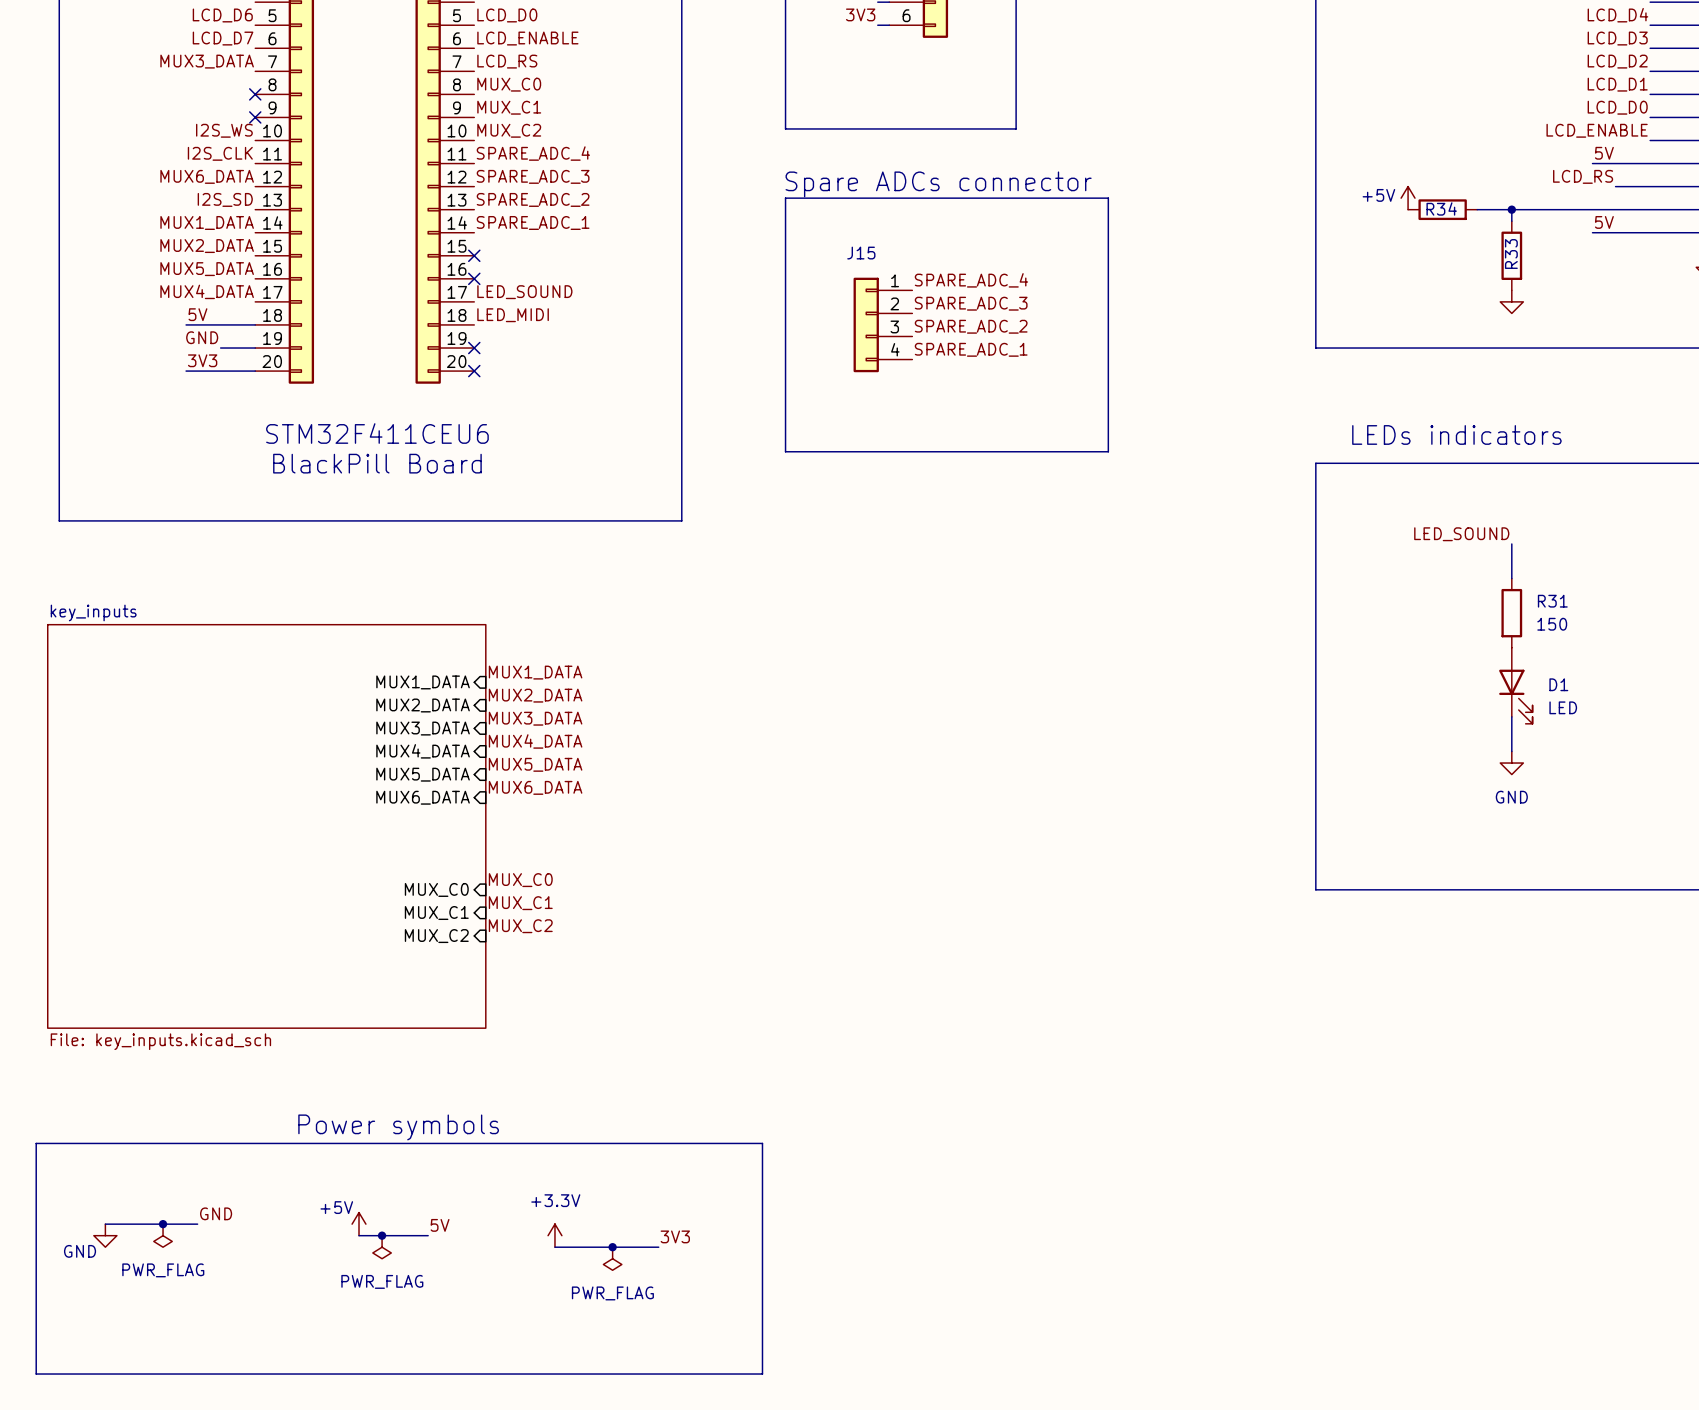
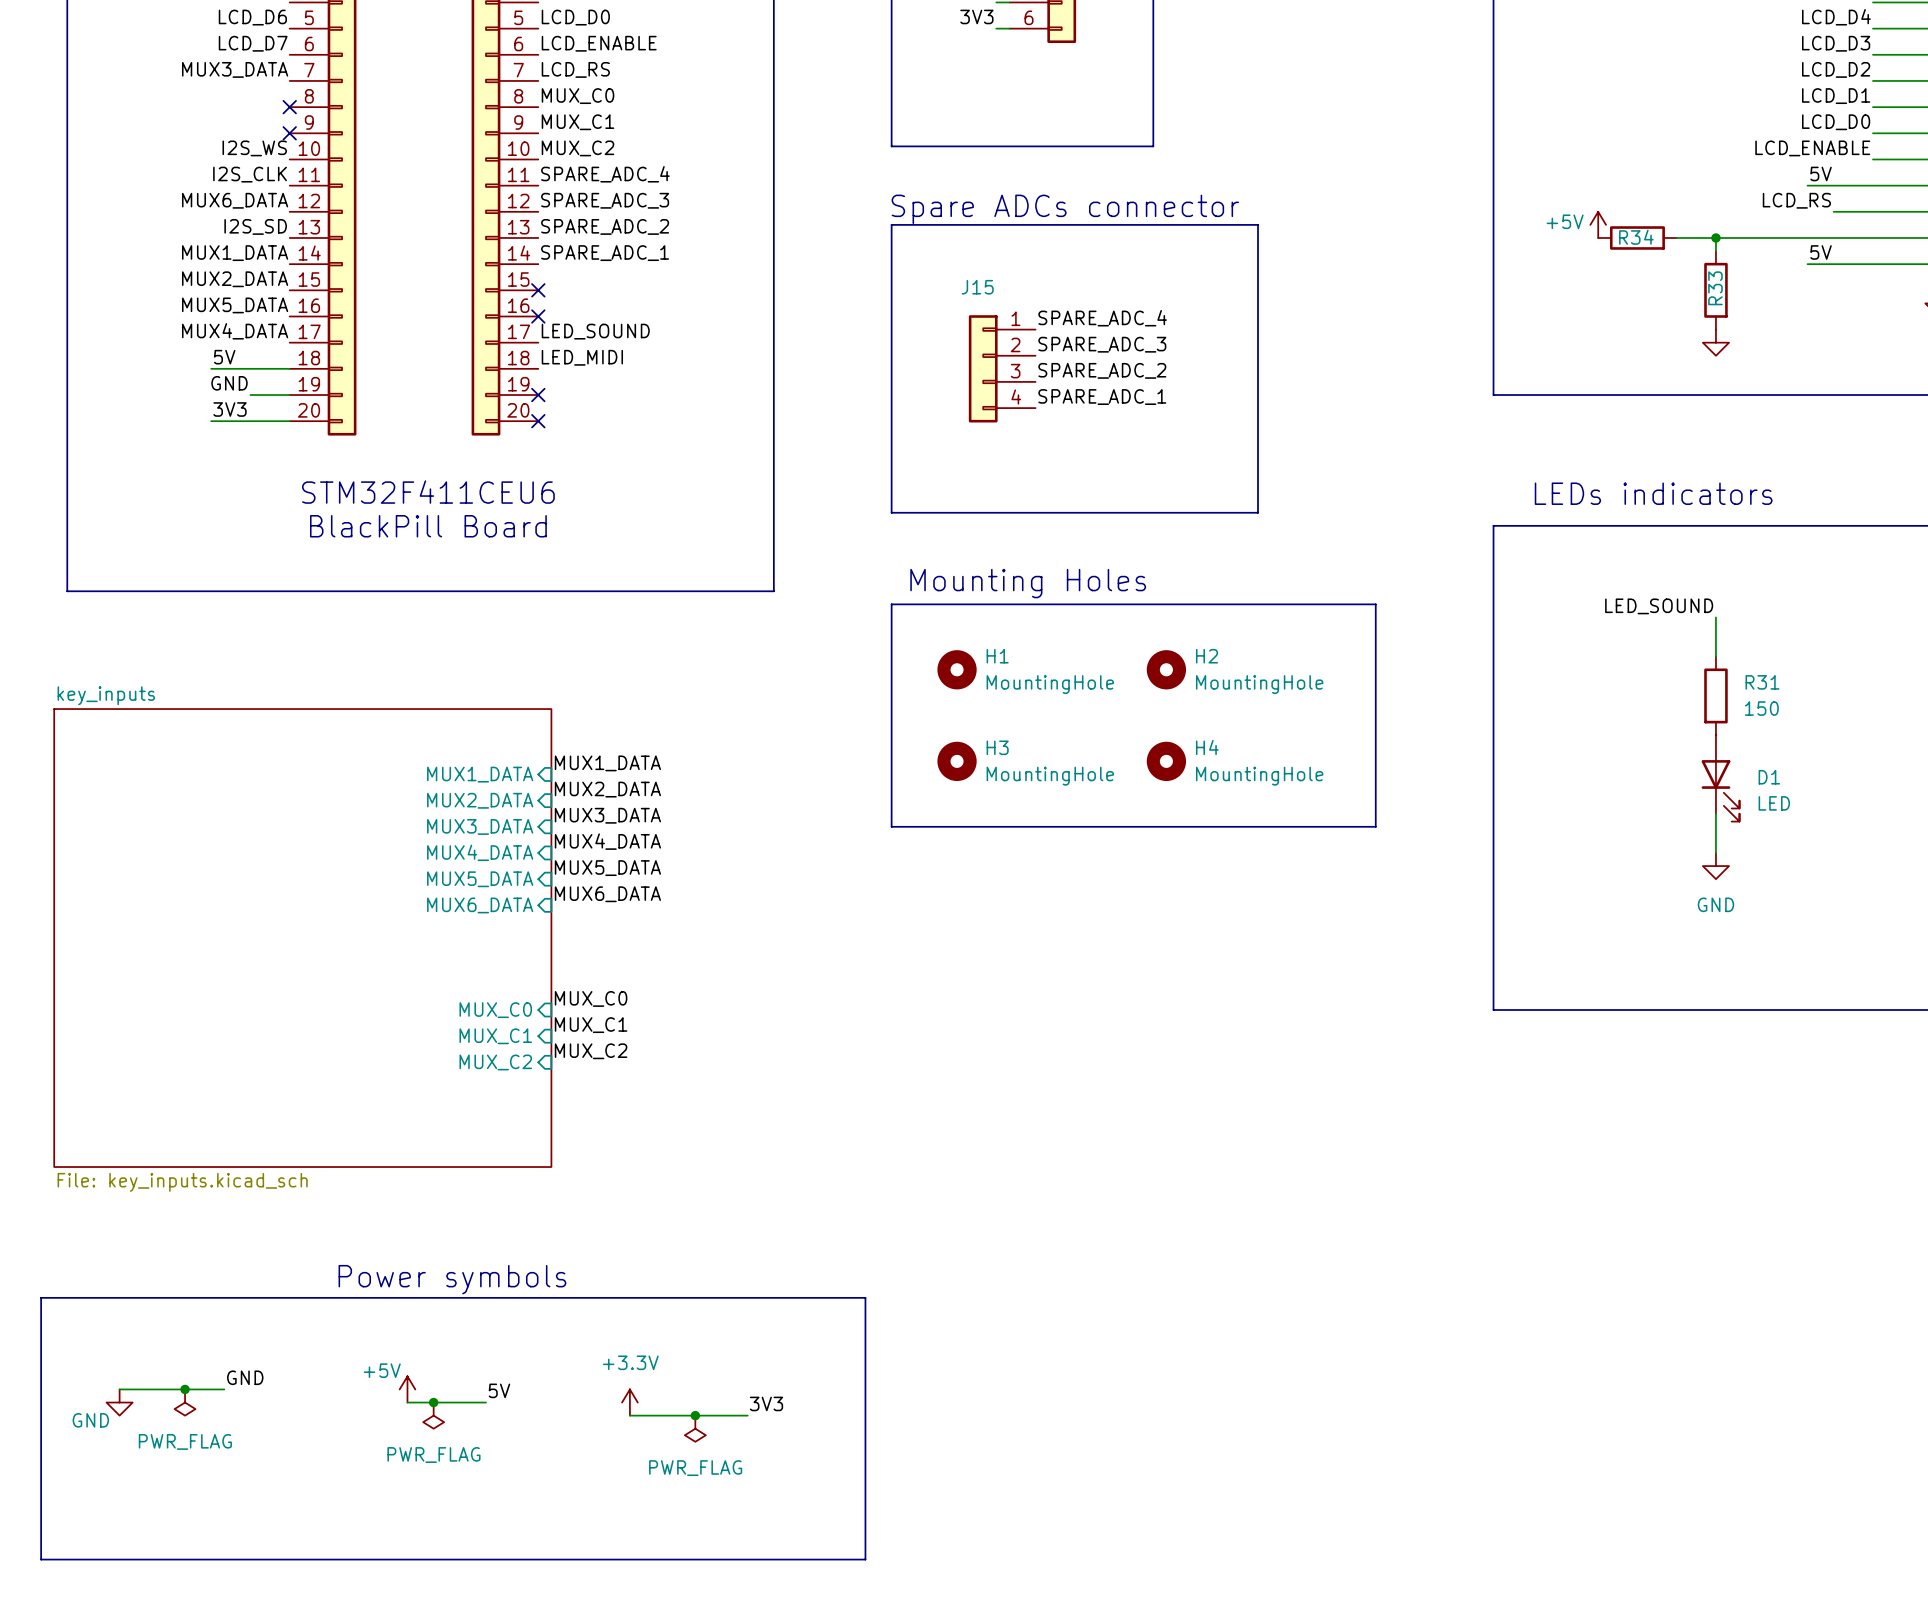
text: none -> Mounting Holes (1028, 583)
line: none -> (891, 604) (1375, 604) (1375, 826) (891, 826) (891, 604)
H1: none -> MountingHole (957, 669)
H2: none -> MountingHole (1166, 669)
H3: none -> MountingHole (957, 761)
H4: none -> MountingHole (1166, 761)

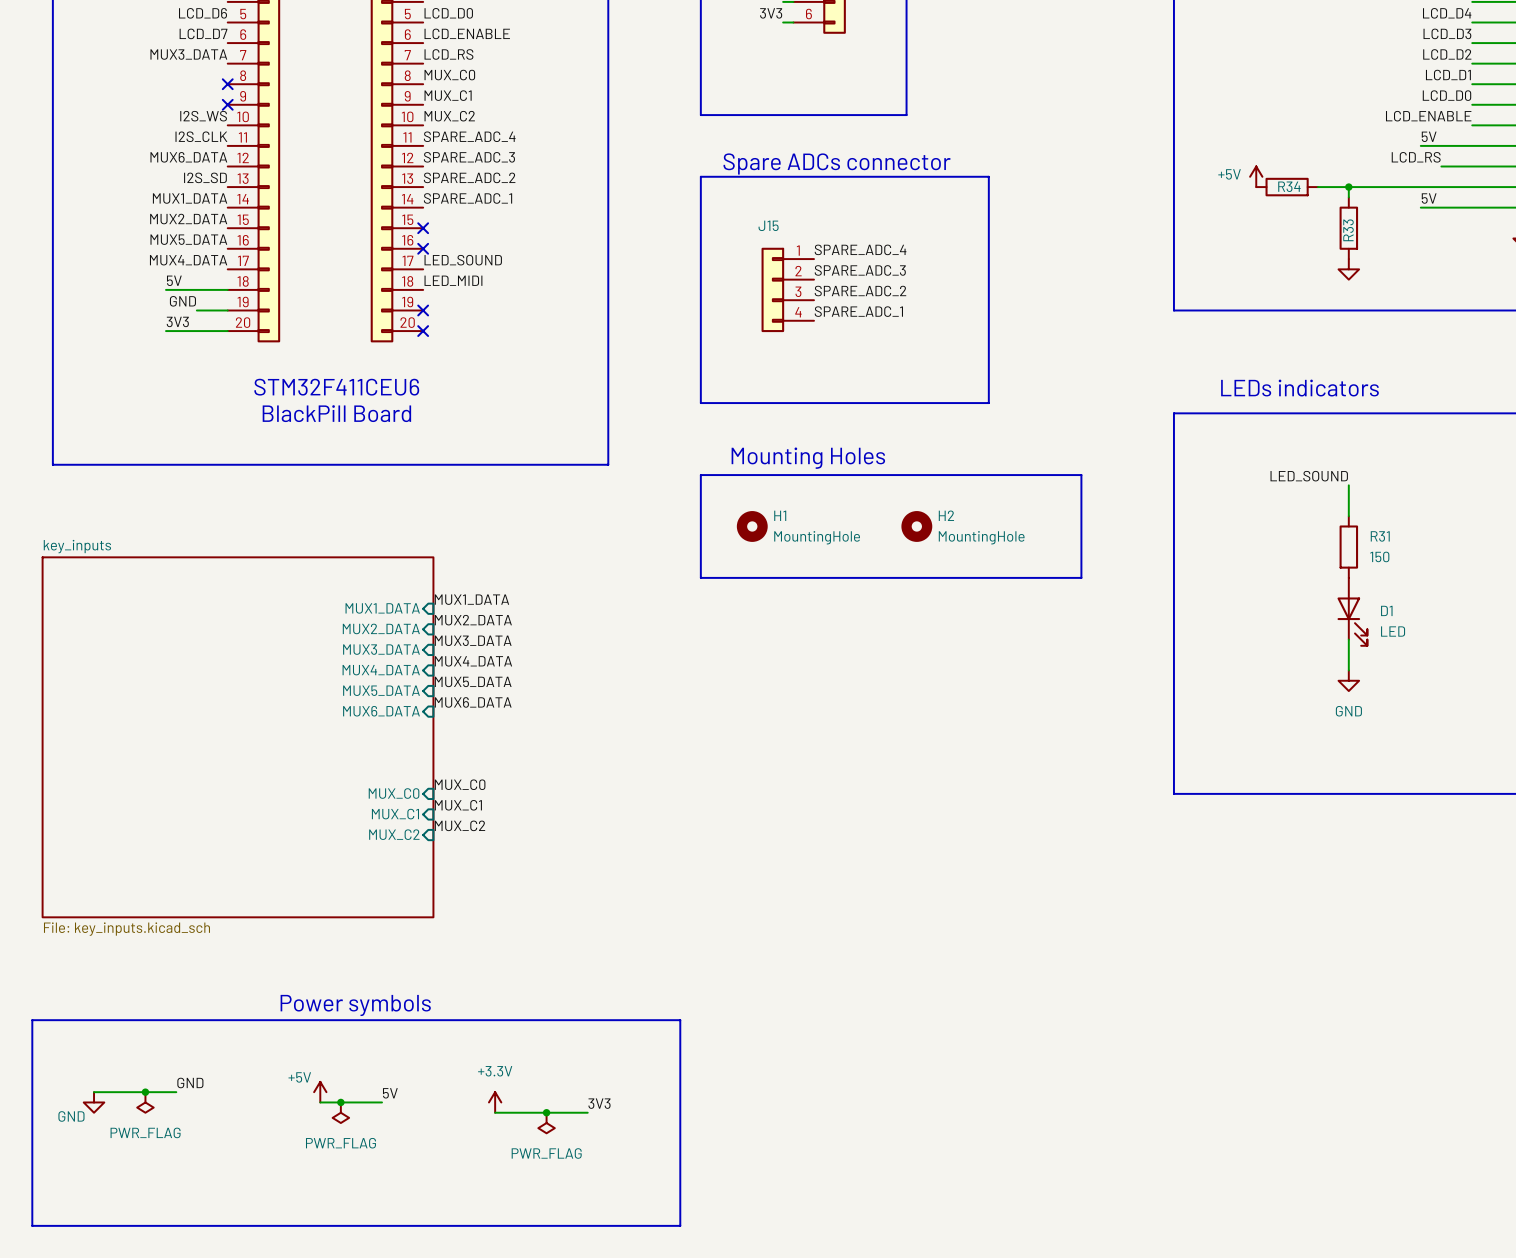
line: (891, 735) (891, 826) (1375, 826) (1375, 735) -> (700, 577) (1081, 577)
H3: MountingHole (957, 761) -> none
H4: MountingHole (1166, 761) -> none

